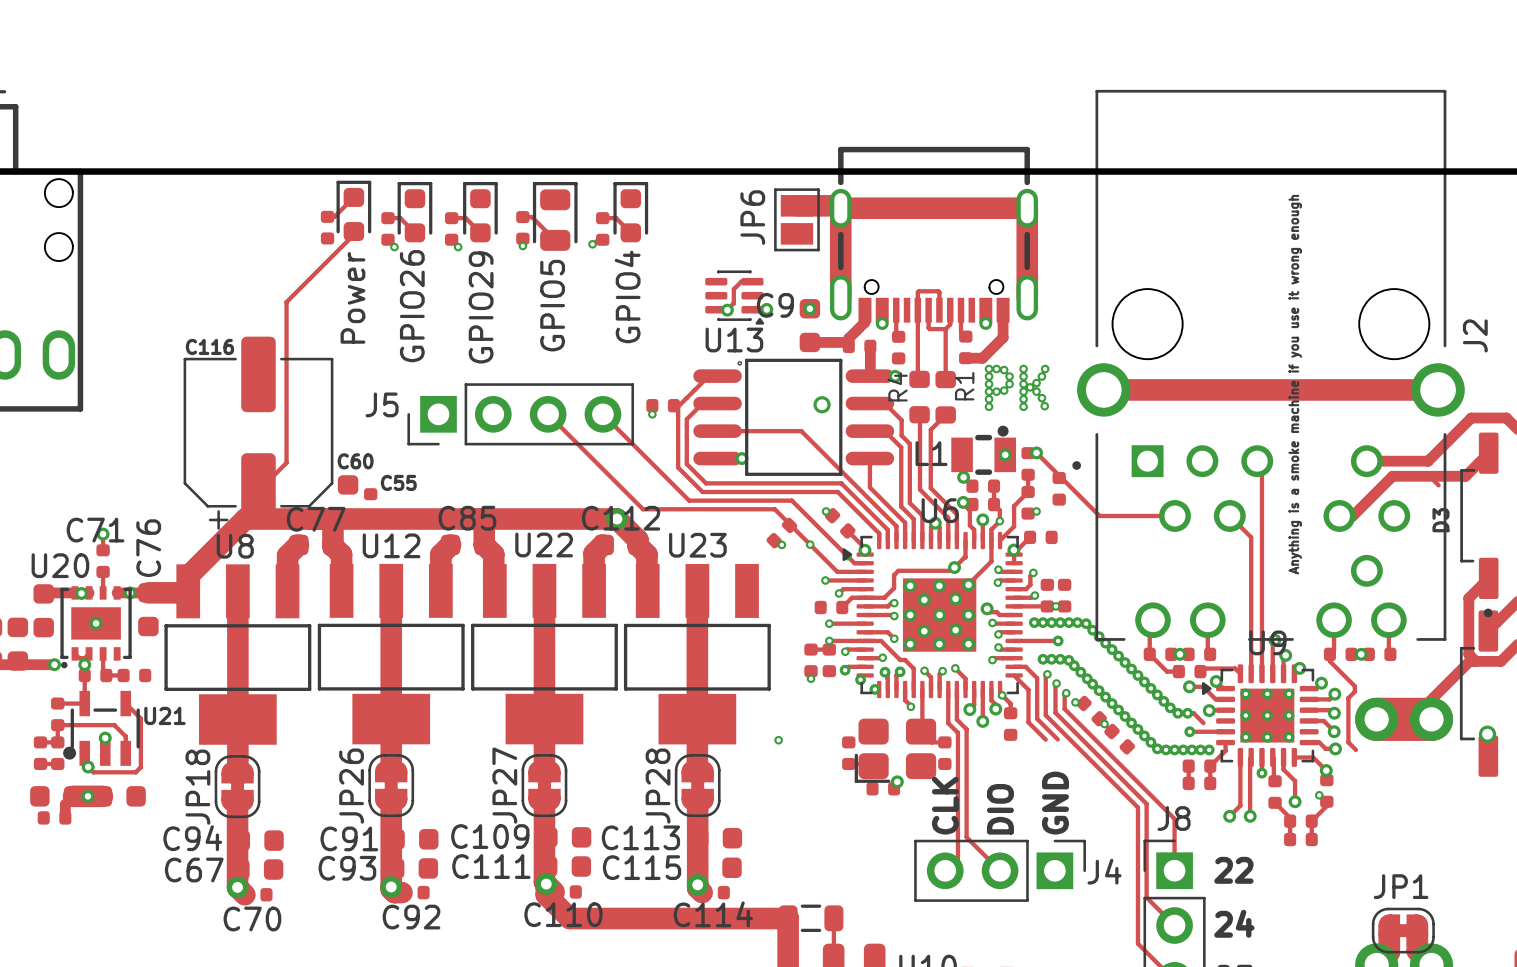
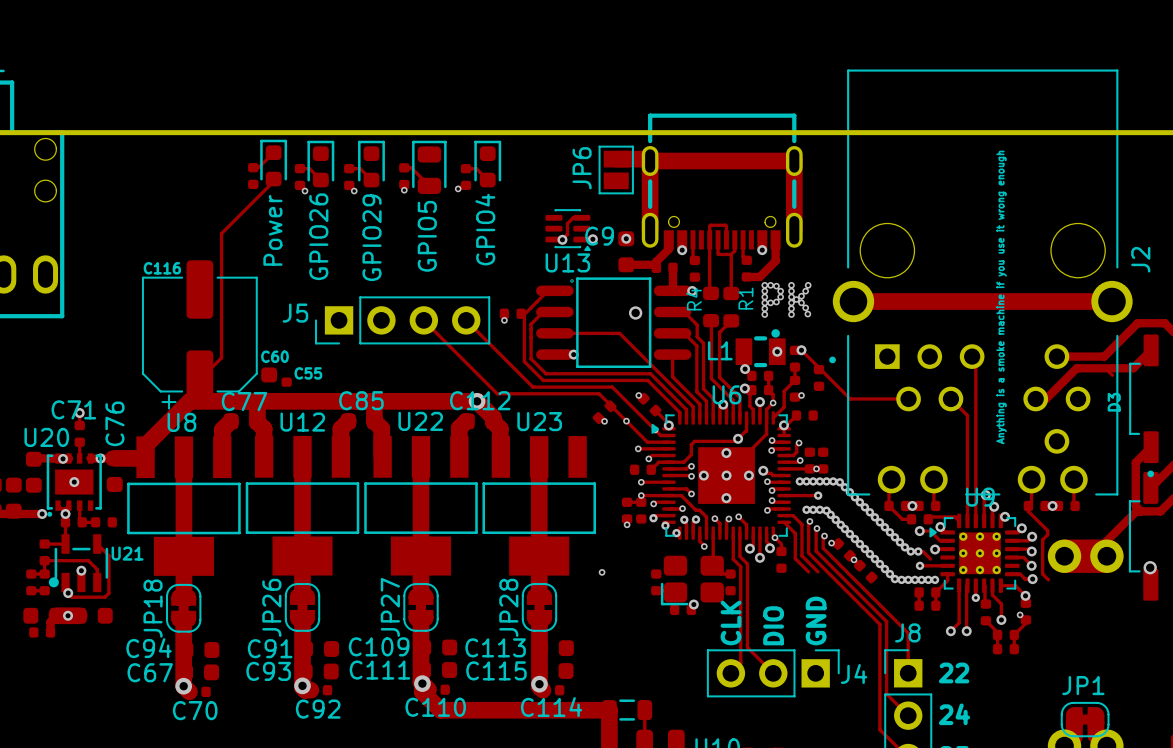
via: (968, 584) -> none
via: (910, 585) -> none
via: (955, 598) -> none
via: (924, 599) -> none
via: (955, 630) -> none
via: (924, 631) -> none
via: (910, 644) -> none
via: (968, 644) -> none

